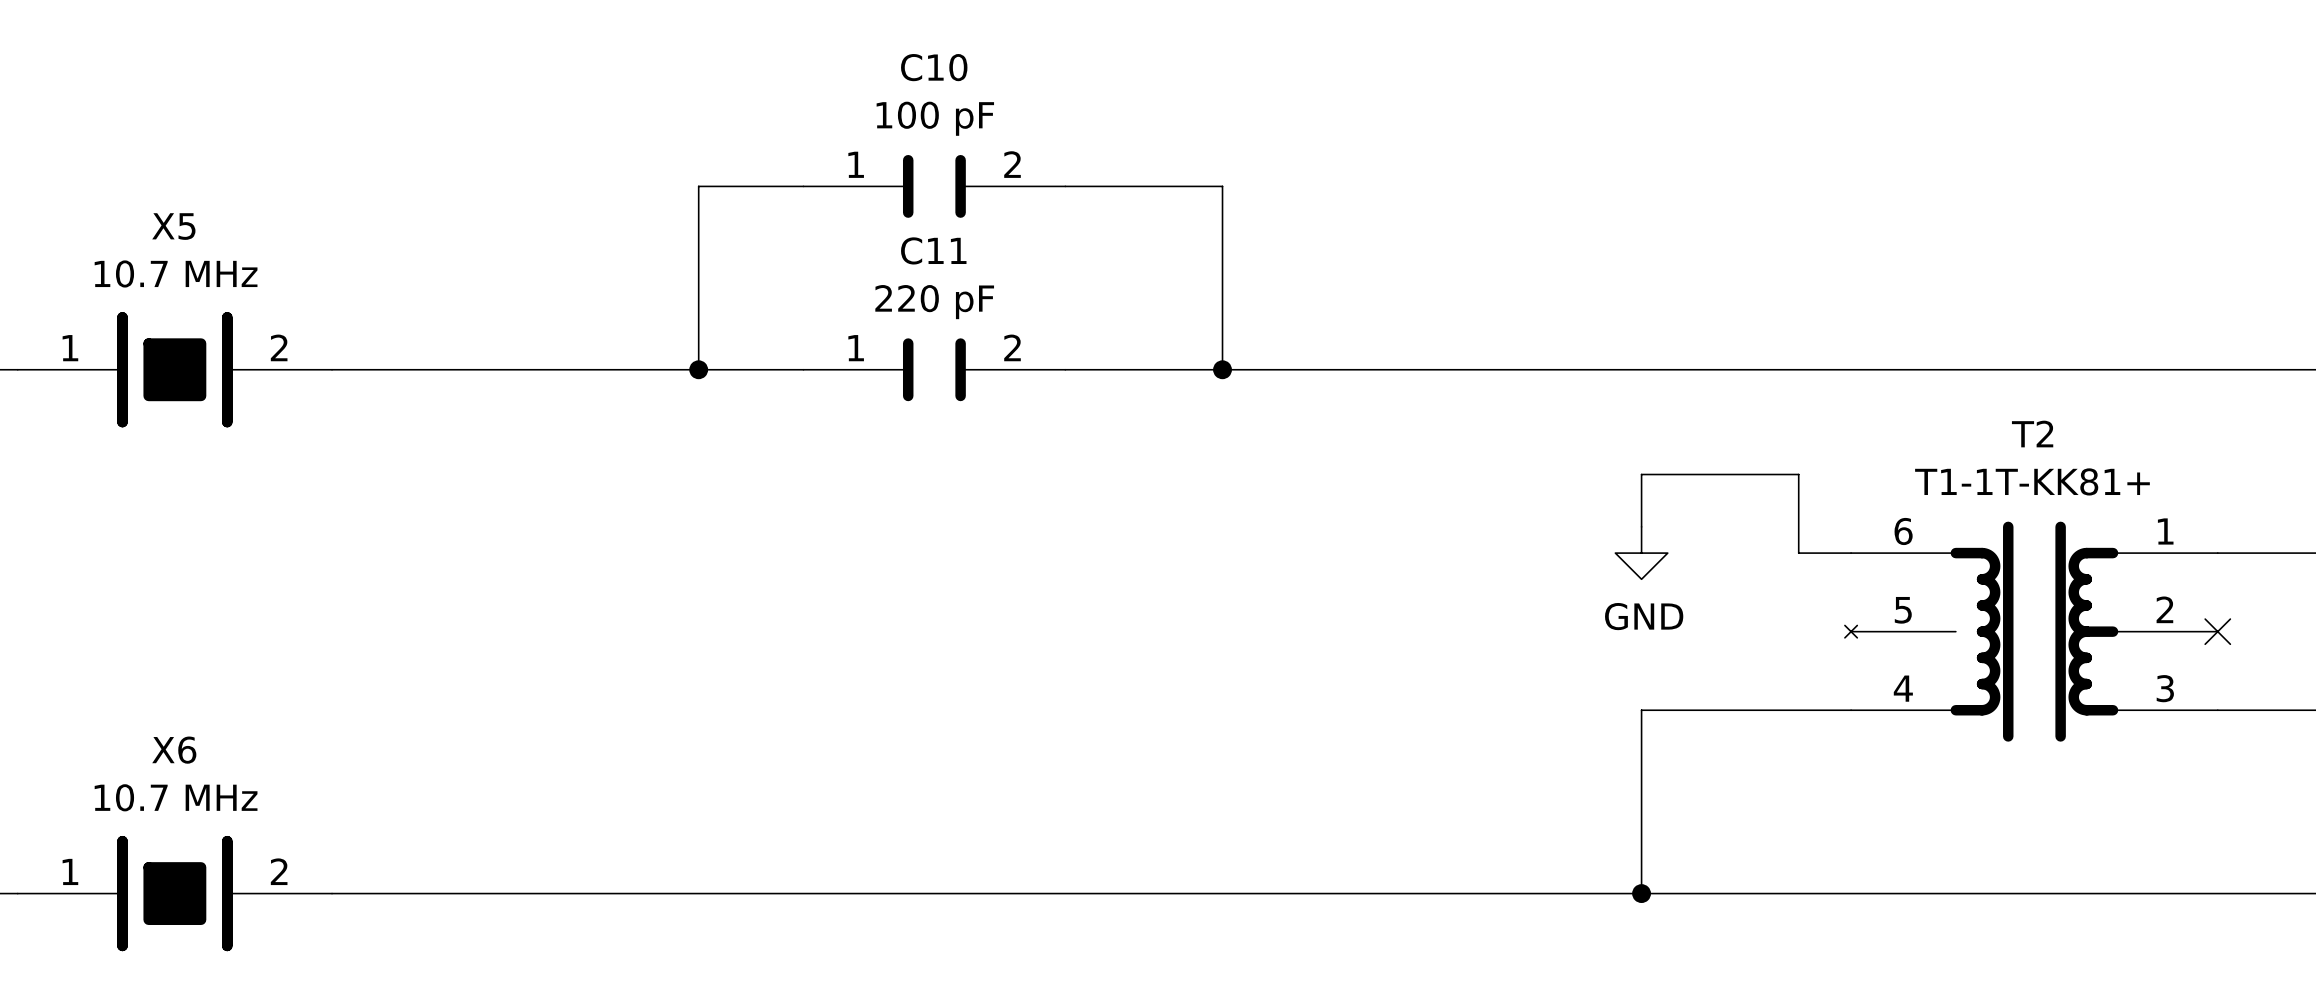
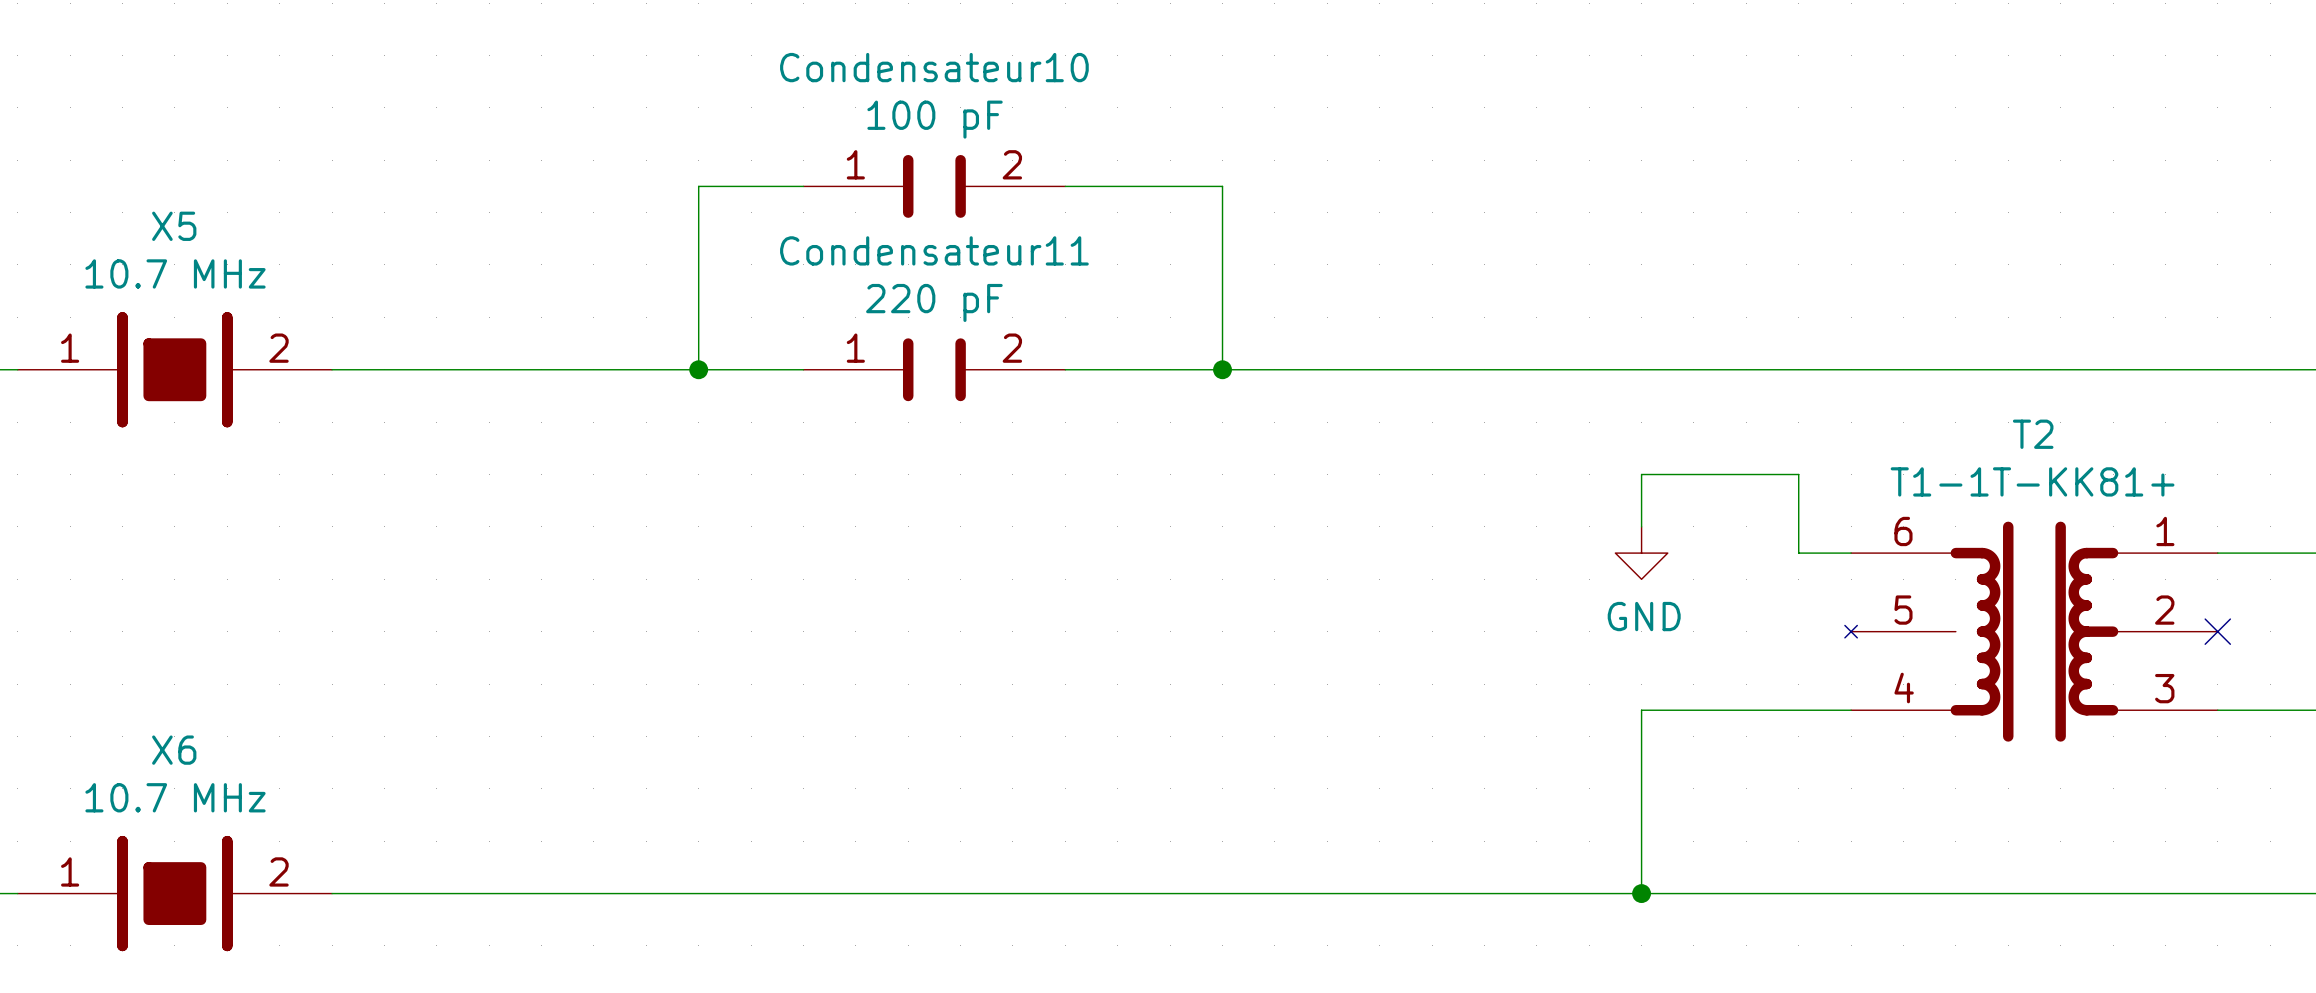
C10 name: C10 (934, 67) -> Condensateur10 (934, 67)
C11 name: C11 (933, 250) -> Condensateur11 (934, 250)

